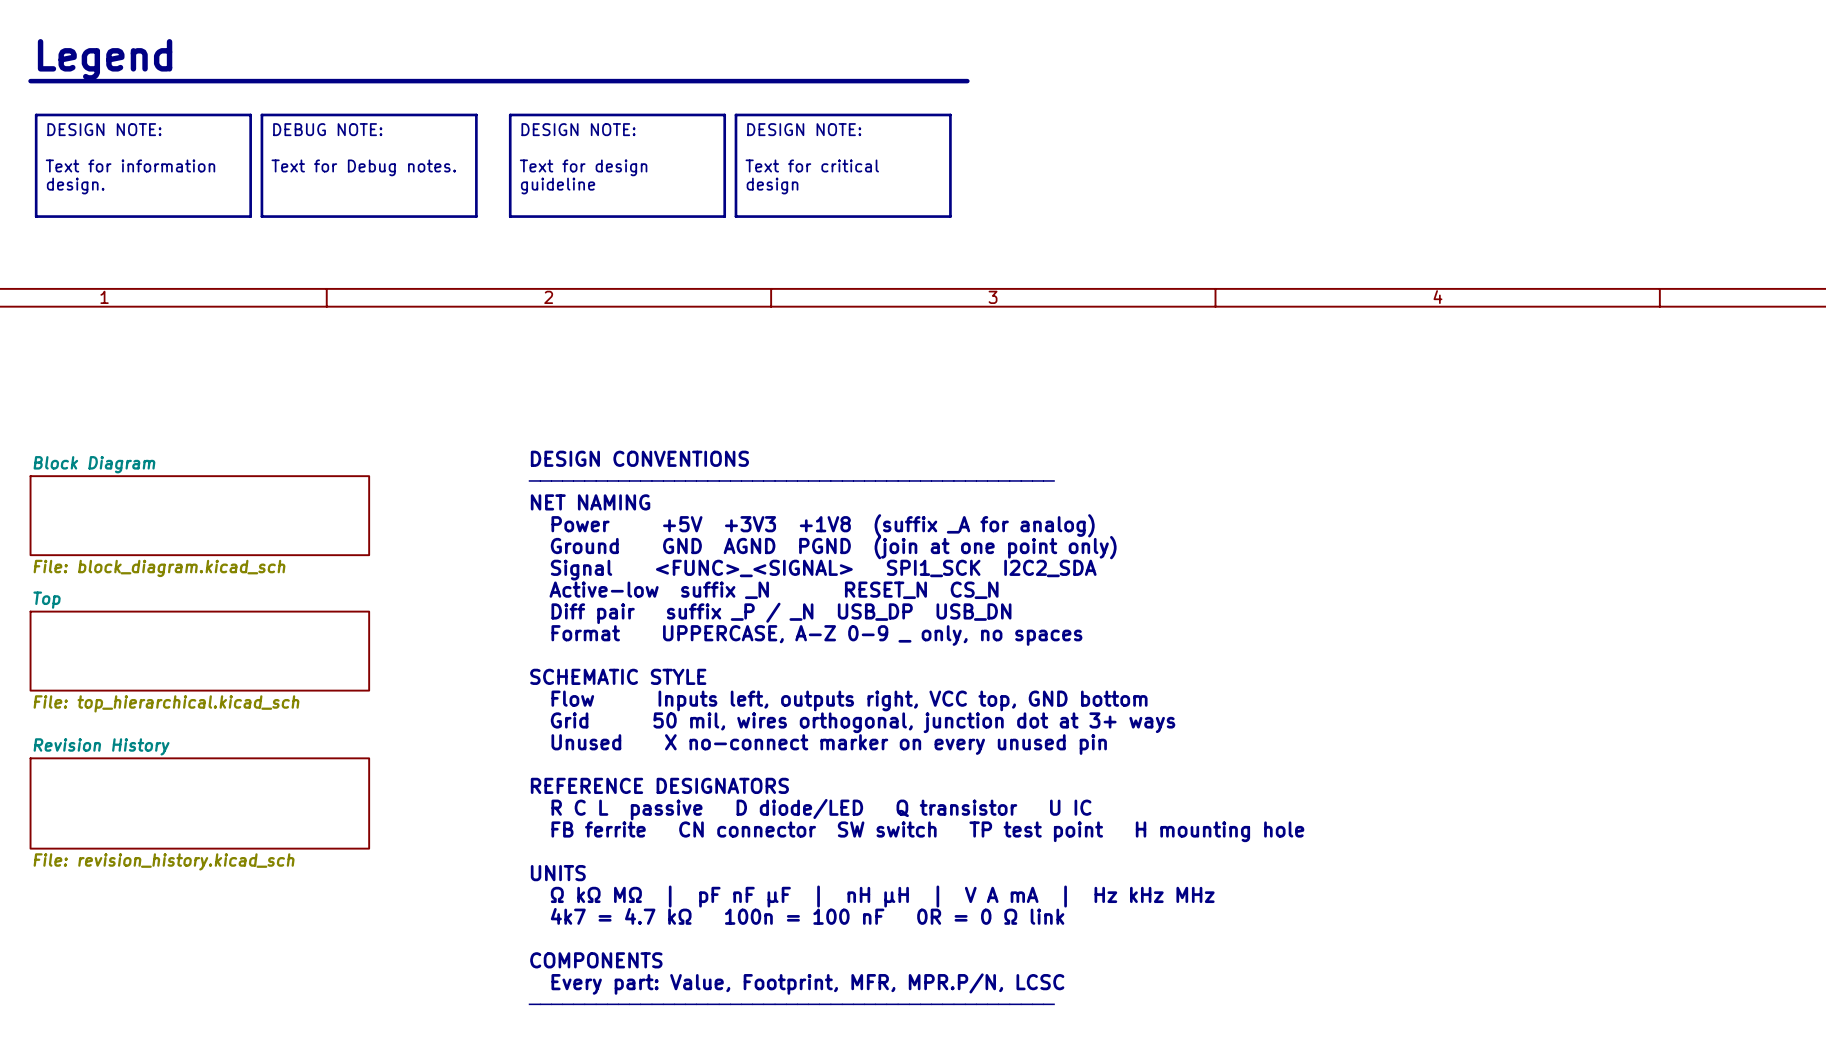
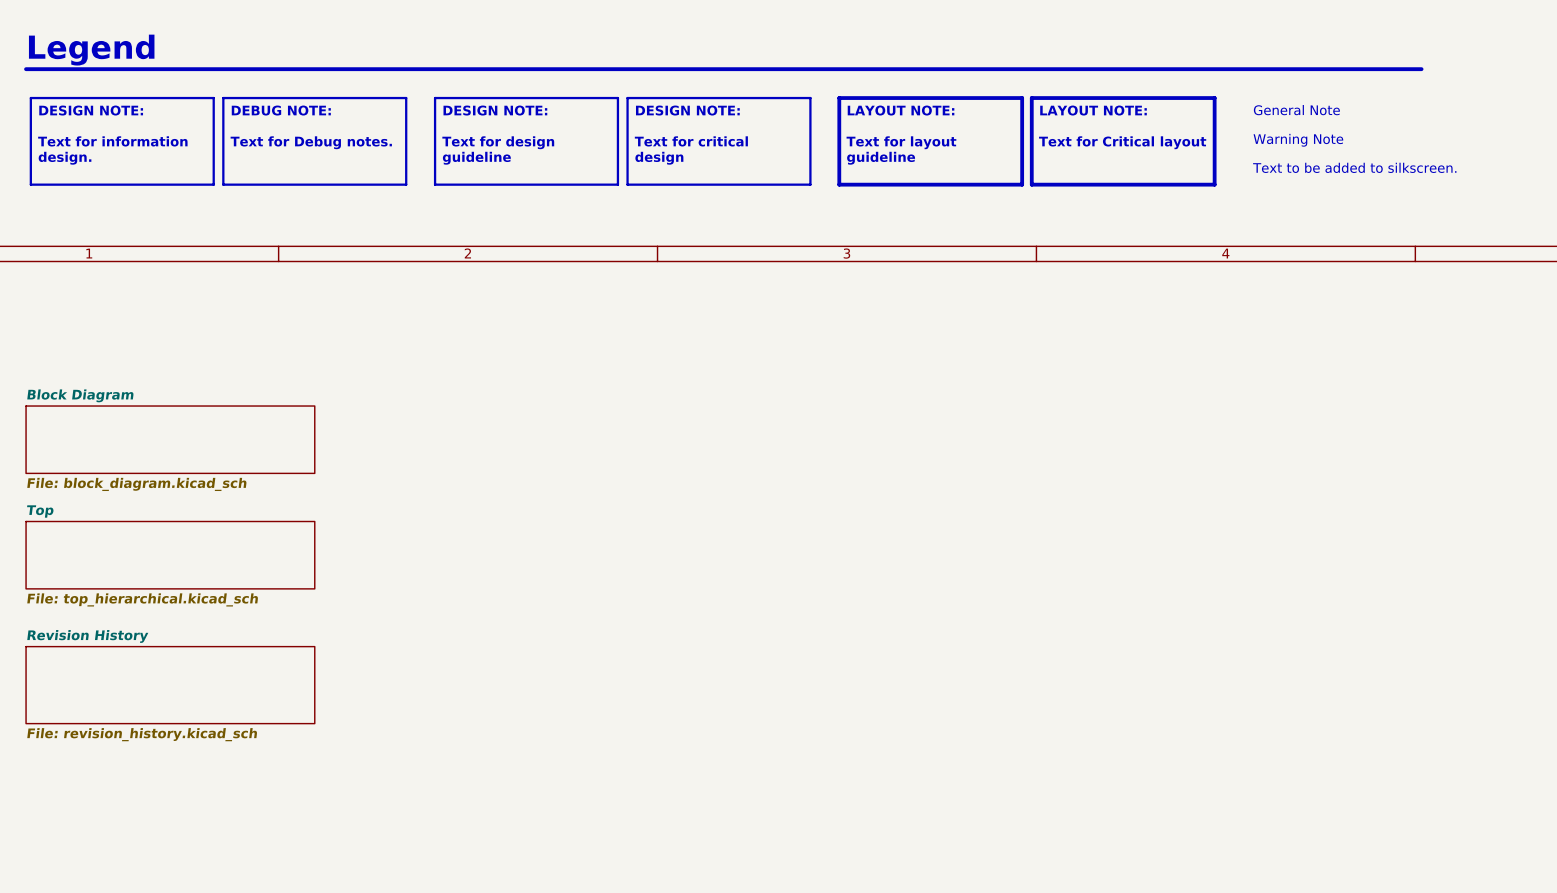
line: none -> (824, 69) (1421, 69)
line: none -> (839, 98) (1022, 98) (1022, 184) (839, 184) (839, 98)
line: none -> (1031, 98) (1214, 98) (1214, 184) (1031, 184) (1031, 98)
text: none -> LAYOUT NOTE: (901, 110)
text: none -> LAYOUT NOTE: (1093, 110)
text: none -> General Note (1296, 110)
text: none -> Warning Note (1298, 140)
text: none -> Text for layout (901, 142)
text: none -> Text for Critical layout (1122, 142)
text: none -> guideline (881, 158)
text: none -> Text to be added to silkscreen. (1354, 167)
text: DESIGN CONVENTIONS (639, 458) -> none
text: ─────────────────────────────────────────────── (791, 480) -> none
text: NET NAMING (590, 502) -> none
text: Power +5V +3V3 +1V8 (suffix _A for analog) (823, 525) -> none
text: Ground GND AGND PGND (join at one point only) (833, 547) -> none
text: Signal <FUNC>_<SIGNAL> SPI1_SCK I2C2_SDA (823, 570) -> none
text: Active-low suffix _N RESET_N CS_N (774, 590) -> none
text: Diff pair suffix _P / _N USB_DP USB_DN (781, 613) -> none
text: Format UPPERCASE, A-Z 0-9 _ only, no spaces (816, 635) -> none
text: SCHEMATIC STYLE (618, 676) -> none
text: Flow Inputs left, outputs right, VCC top, GND bottom (849, 700) -> none
text: Grid 50 mil, wires orthogonal, junction dot at 3+ ways (863, 722) -> none
text: Unused X no-connect marker on every unused pin (829, 744) -> none
text: REFERENCE DESIGNATORS (659, 785) -> none
text: R C L passive D diode/LED Q transistor U IC (821, 809) -> none
text: FB ferrite CN connector SW switch TP test point H mounting hole (927, 831) -> none
text: UNITS (558, 873) -> none
text: Ω kΩ MΩ | pF nF µF | nH µH | V A mA | Hz kHz MHz (882, 896) -> none
text: 4k7 = 4.7 kΩ 100n = 100 nF 0R = 0 Ω link (807, 916) -> none
text: COMPONENTS (596, 960) -> none
text: Every part: Value, Footprint, MFR, MPR.P/N, LCSC (807, 984) -> none
text: ─────────────────────────────────────────────── (791, 1004) -> none

